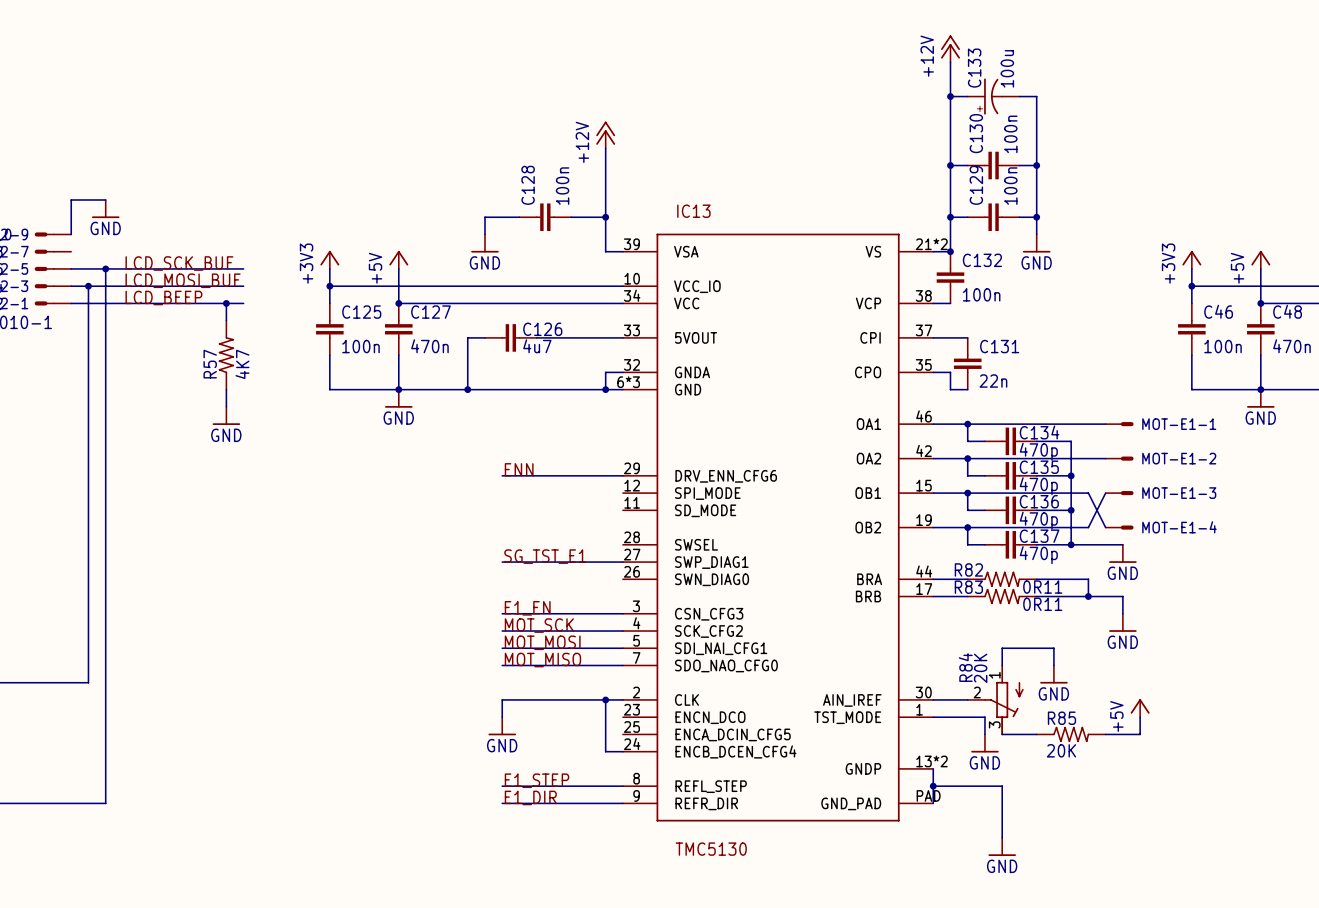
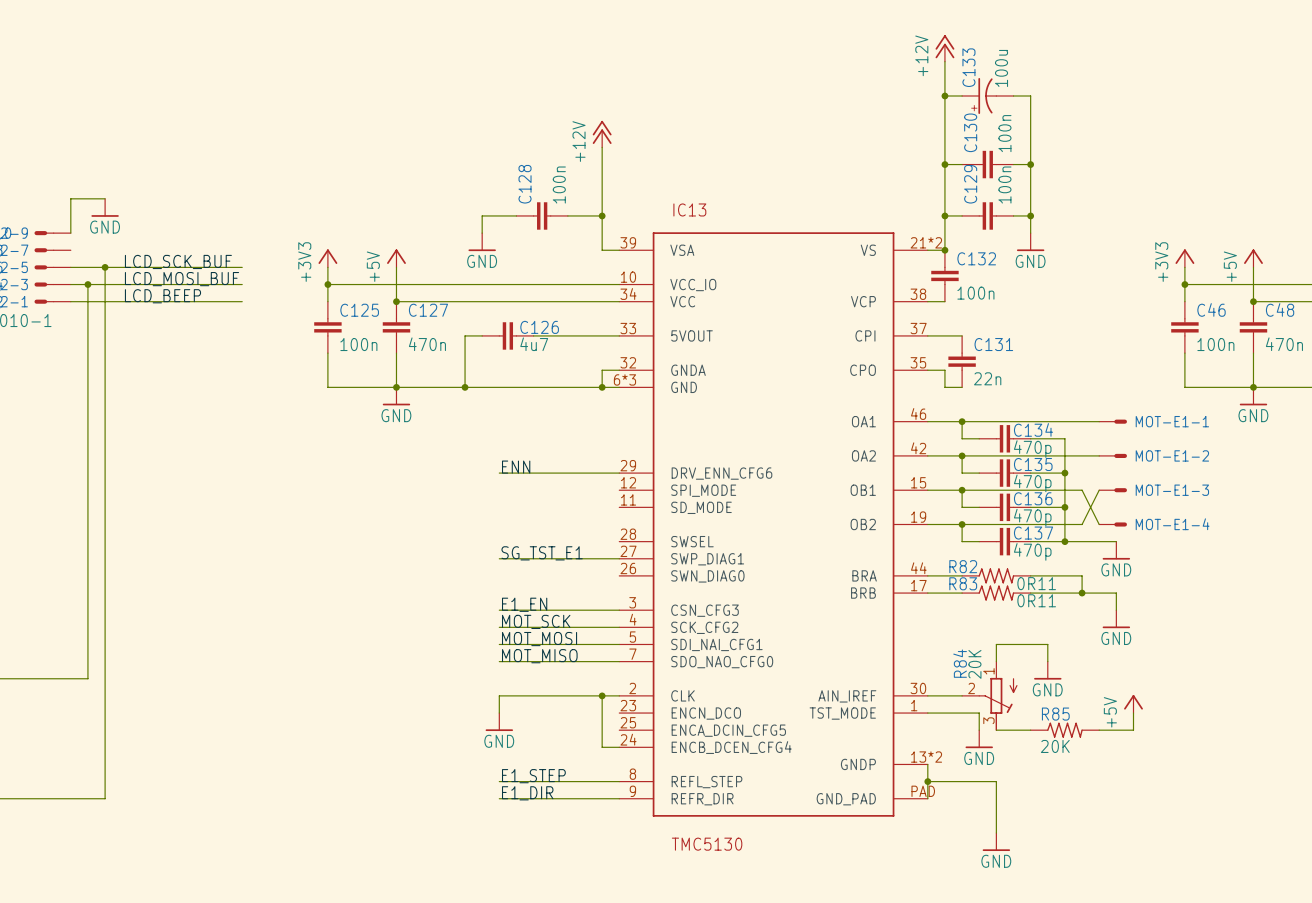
wire: (226, 303) (226, 320) -> none
junction: (226, 303) -> none
R57: 4K7 (226, 355) -> none
wire: (226, 389) (226, 406) -> none
power symbol: GND (226, 415) -> none

